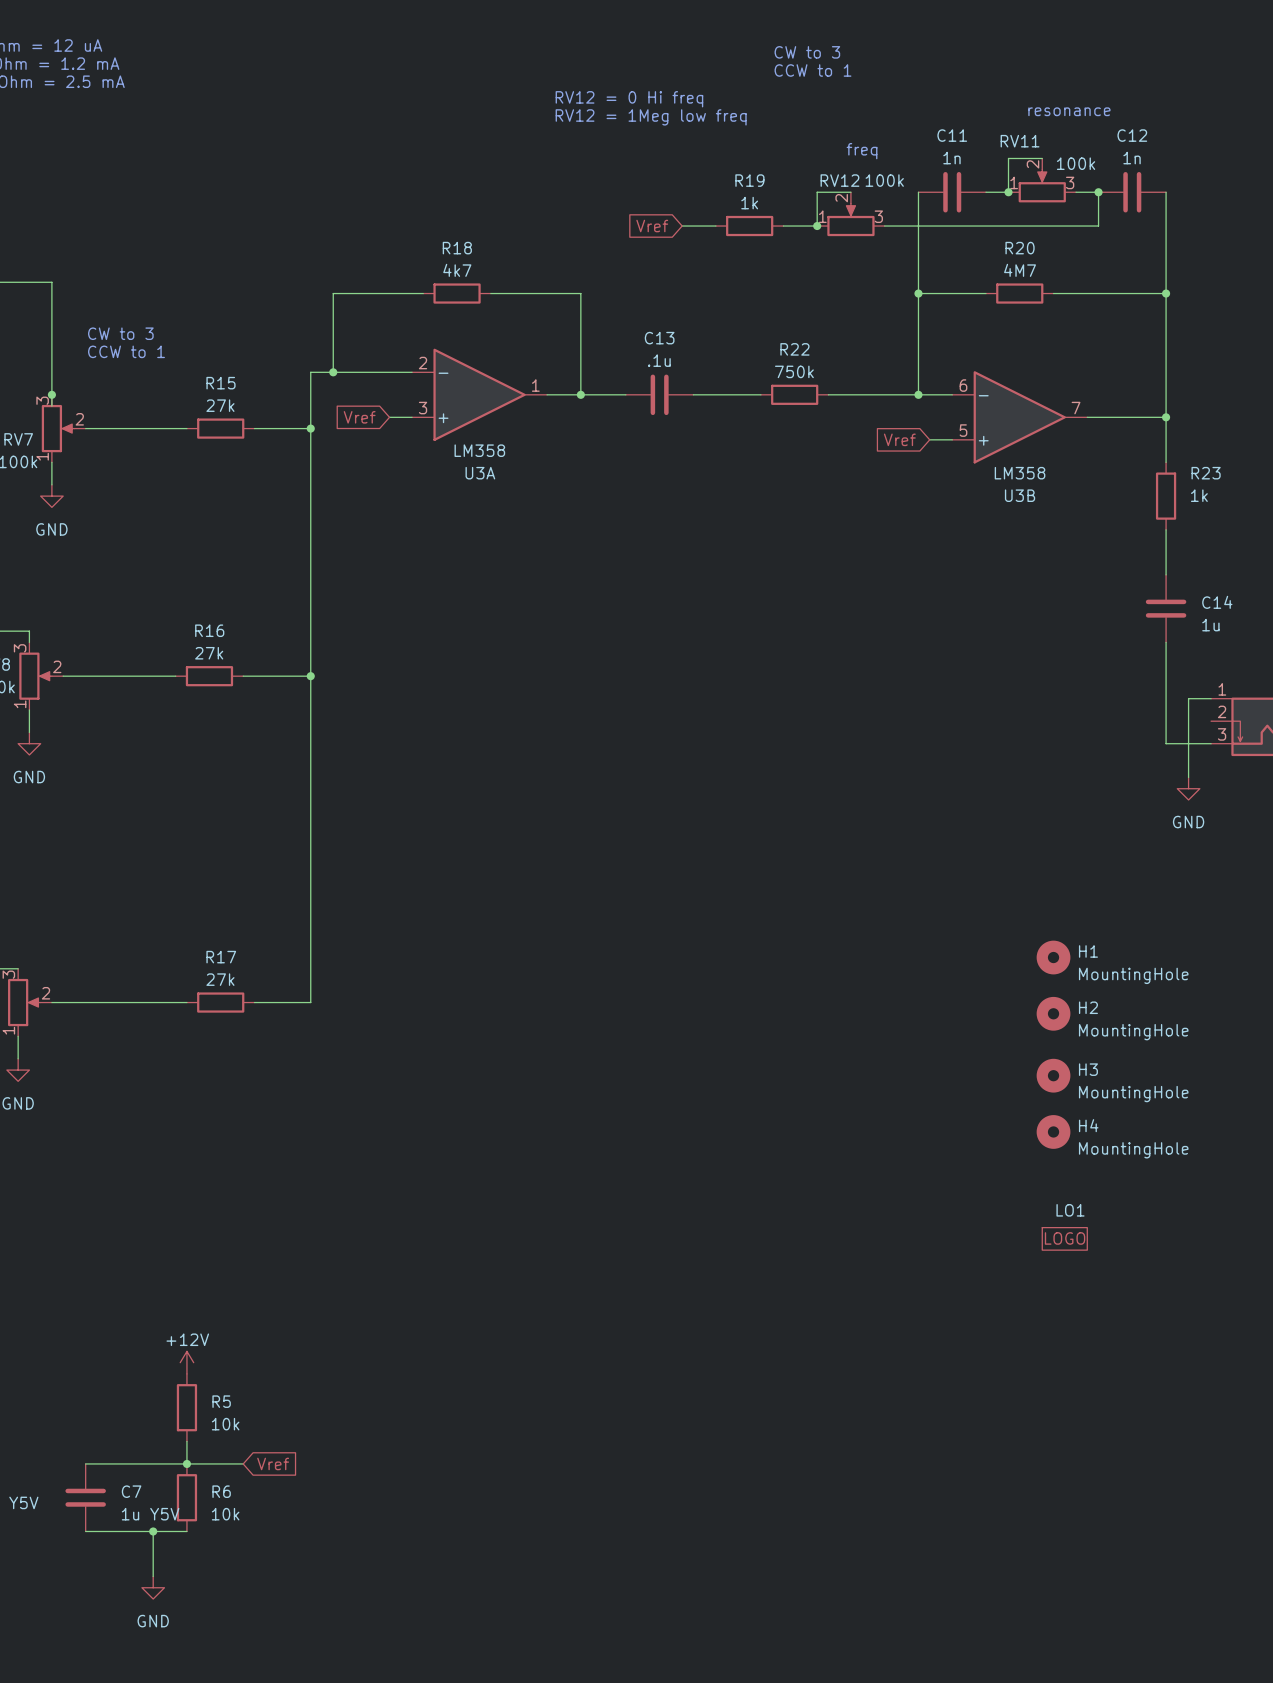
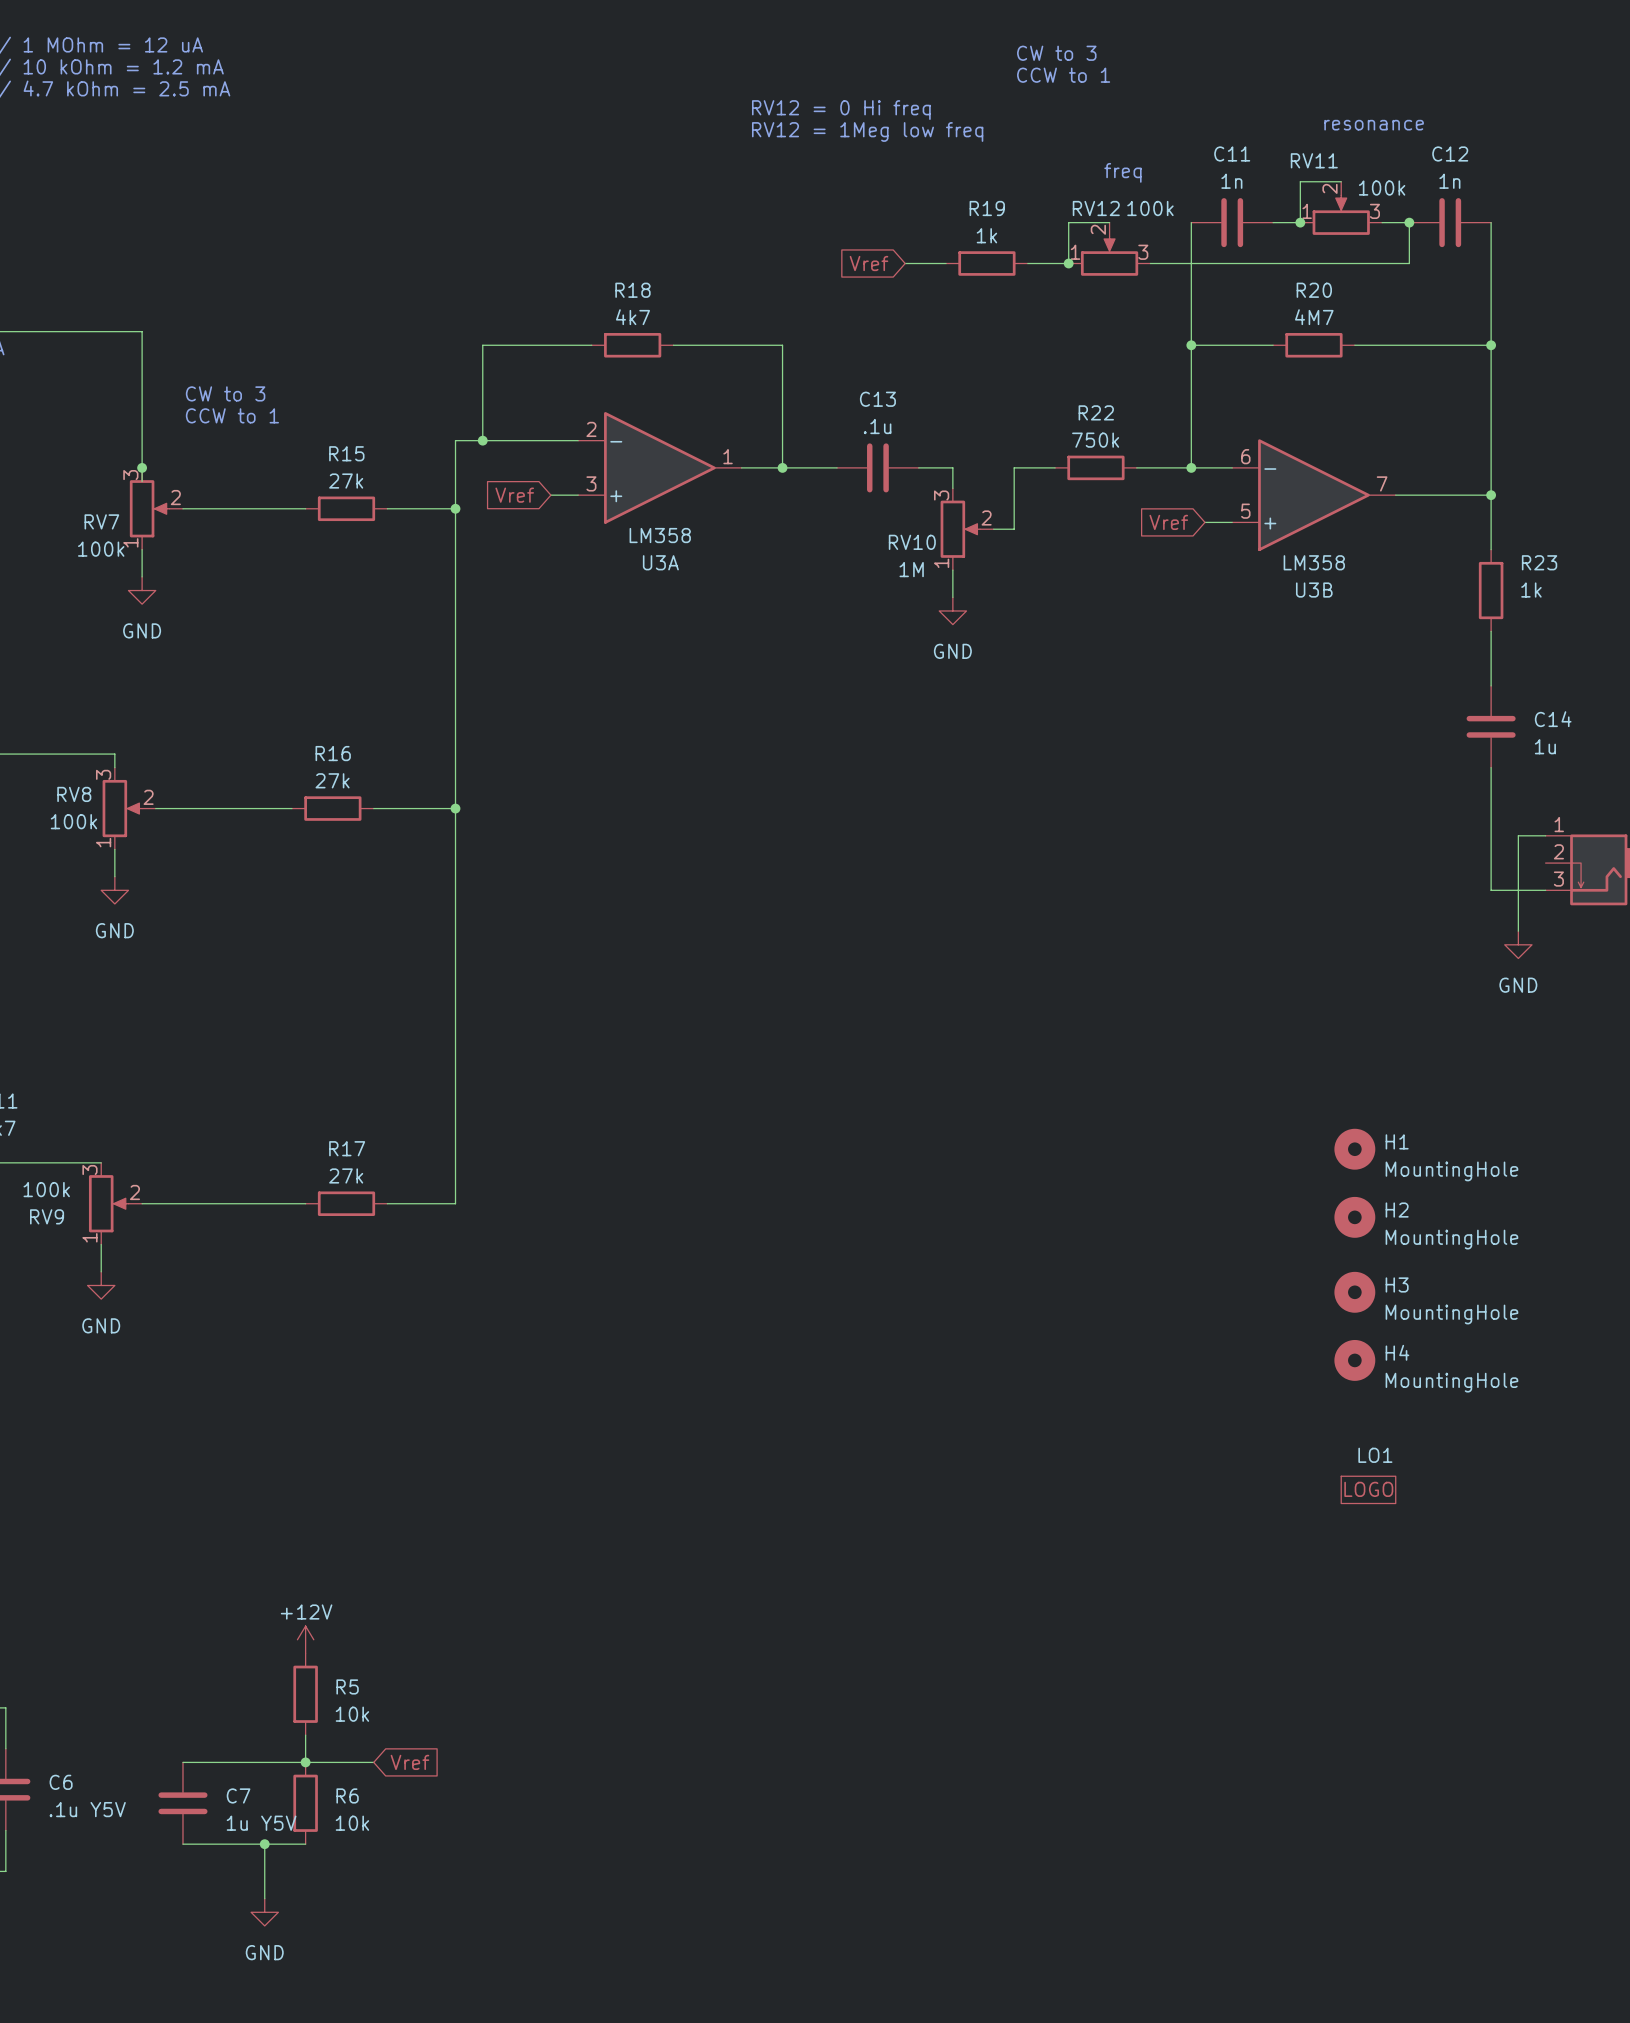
wire: (721, 394) (760, 394) -> (952, 467) (952, 488)
R22 position: (794, 394) -> (1095, 467)
wire: none -> (1055, 467) (1014, 467) (1014, 529) (993, 529)
wire: (828, 394) (873, 394) -> none
RV10: none -> 1M (967, 529)
wire: none -> (952, 570) (952, 597)
power symbol: none -> GND (952, 610)

